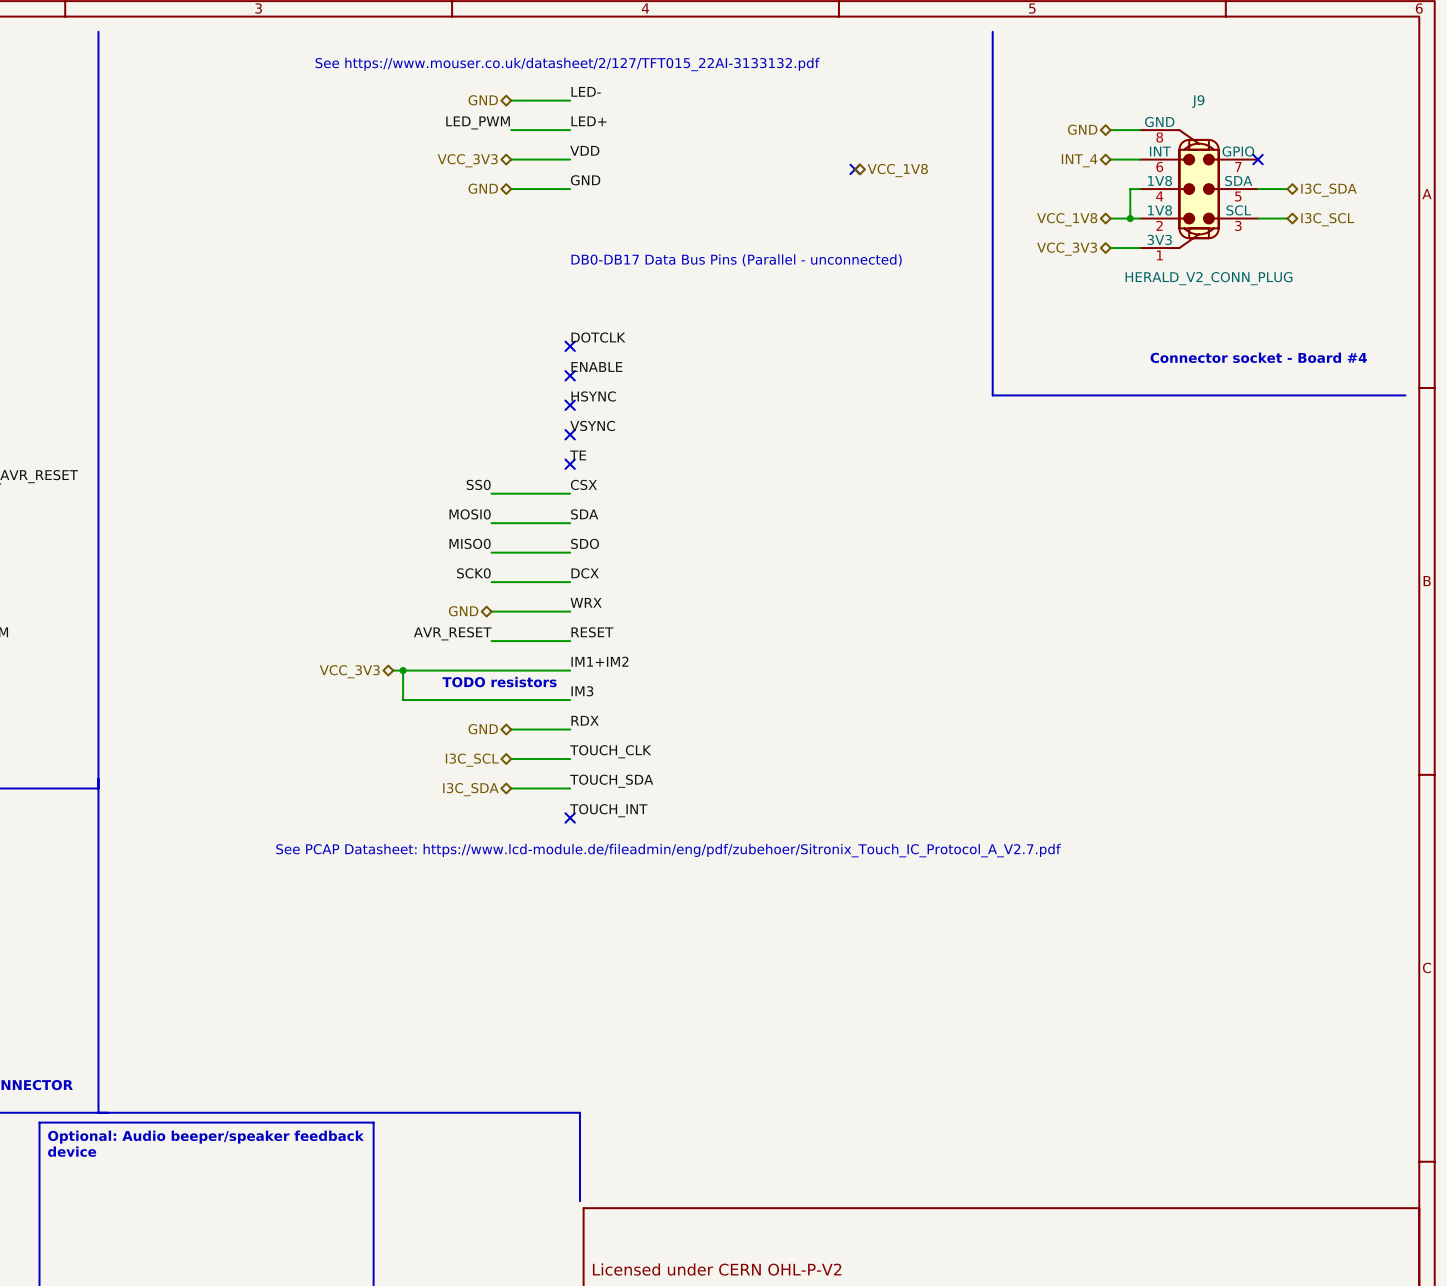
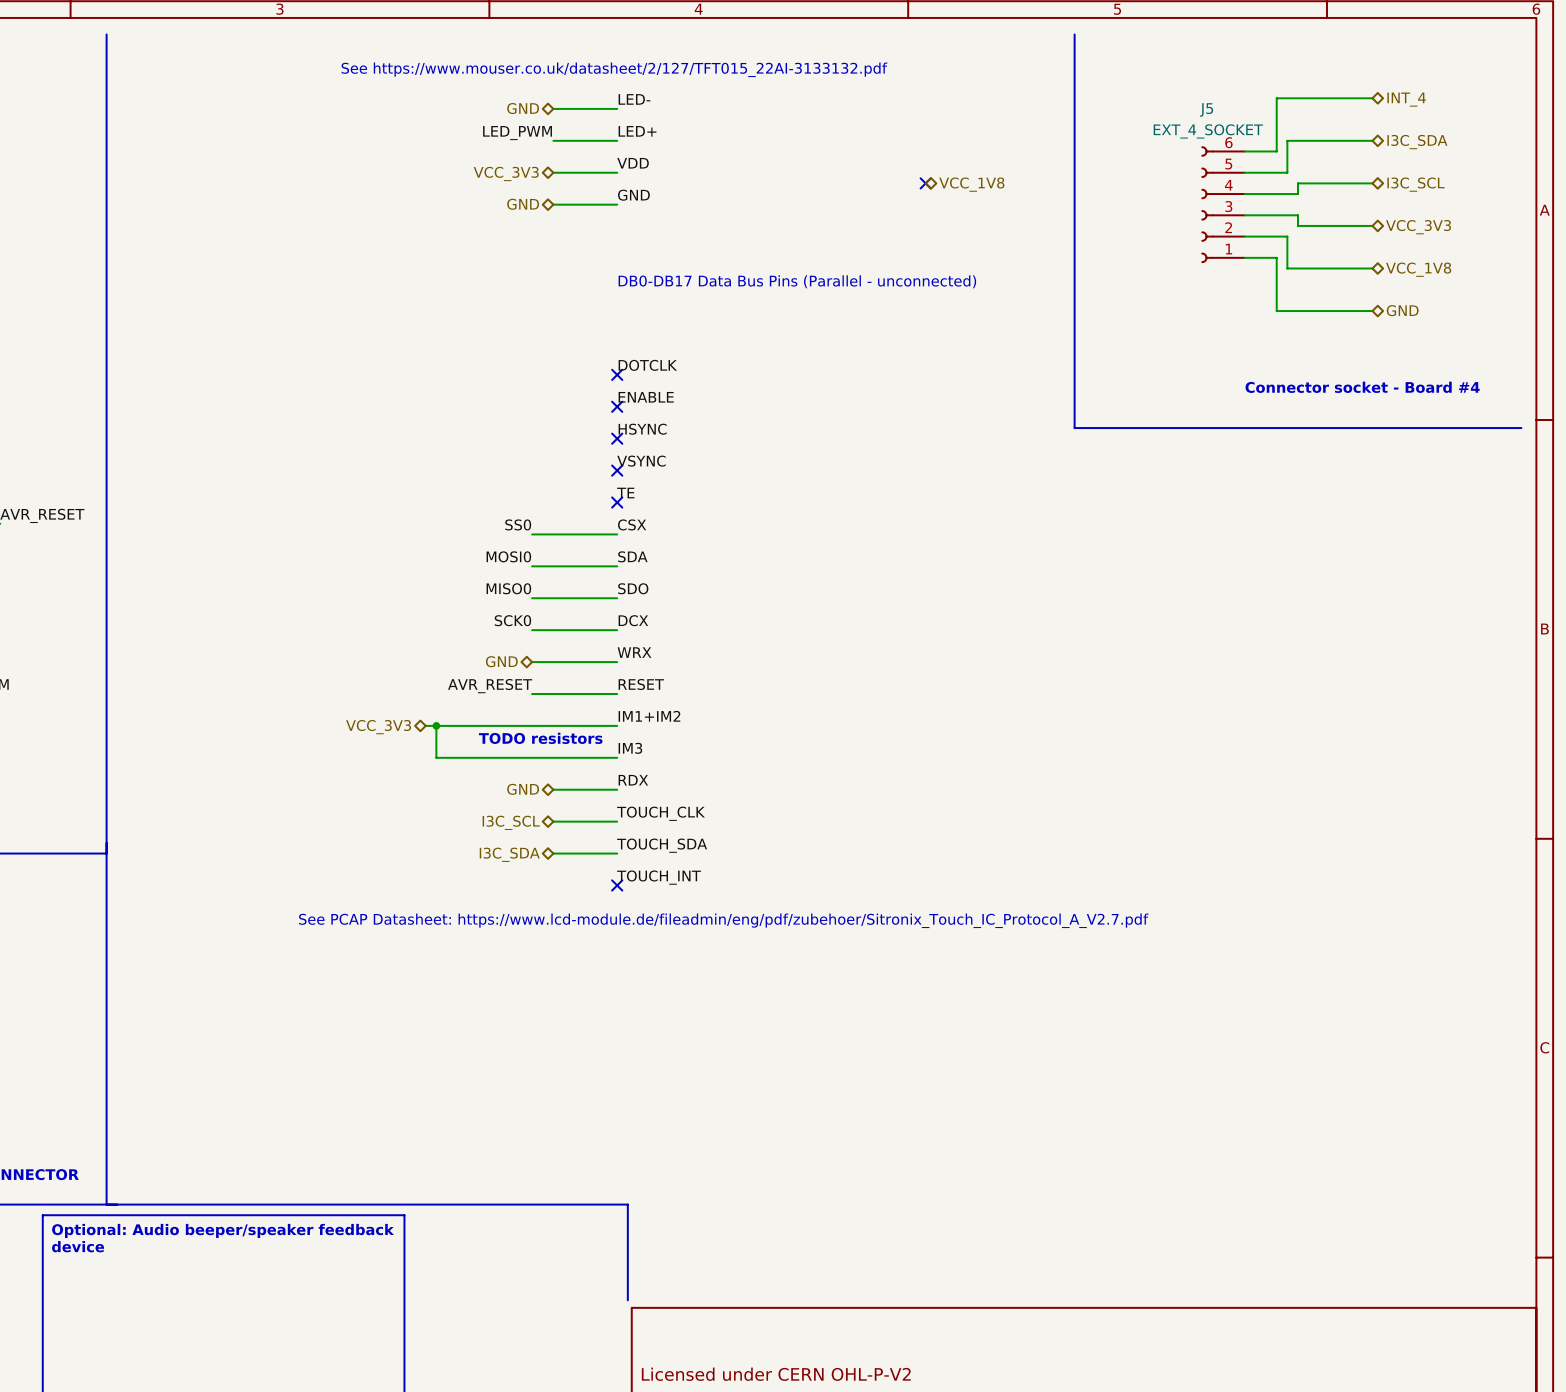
wire: none -> (1372, 98) (1276, 98) (1276, 151) (1244, 151)
hierarchical label: none -> INT_4 (1406, 99)
hierarchical label: GND (1082, 129) -> none
wire: (1110, 130) (1140, 130) -> none
wire: none -> (1372, 140) (1287, 140) (1287, 172) (1244, 172)
no-connect mark: (1258, 159) -> none
hierarchical label: INT_4 (1079, 160) -> none
wire: none -> (1372, 183) (1298, 183) (1298, 194) (1244, 194)
J5: none -> EXT_4_SOCKET (1223, 204)
wire: (1140, 189) (1130, 189) (1130, 218) -> none
J9: HERALD_V2_CONN_PLUG (1199, 189) -> none
wire: (1258, 189) (1287, 189) -> none
hierarchical label position: I3C_SDA (1329, 190) -> I3C_SDA (1417, 142)
wire: none -> (1244, 215) (1298, 215) (1298, 225) (1372, 225)
junction: (1130, 218) -> none
wire: none -> (1244, 236) (1287, 236) (1287, 268) (1372, 268)
wire: (1258, 218) (1287, 218) -> none
hierarchical label rotation: 0° (1067, 219) -> 180° (1418, 269)
hierarchical label position: VCC_1V8 (1067, 219) -> VCC_1V8 (1418, 269)
hierarchical label position: I3C_SCL (1327, 219) -> I3C_SCL (1415, 184)
wire: none -> (1244, 257) (1276, 257) (1276, 311) (1372, 311)
wire: (1110, 248) (1140, 248) -> none
hierarchical label rotation: 0° (1067, 249) -> 180° (1418, 227)
hierarchical label position: VCC_3V3 (1067, 249) -> VCC_3V3 (1418, 227)
hierarchical label: none -> GND (1402, 310)

